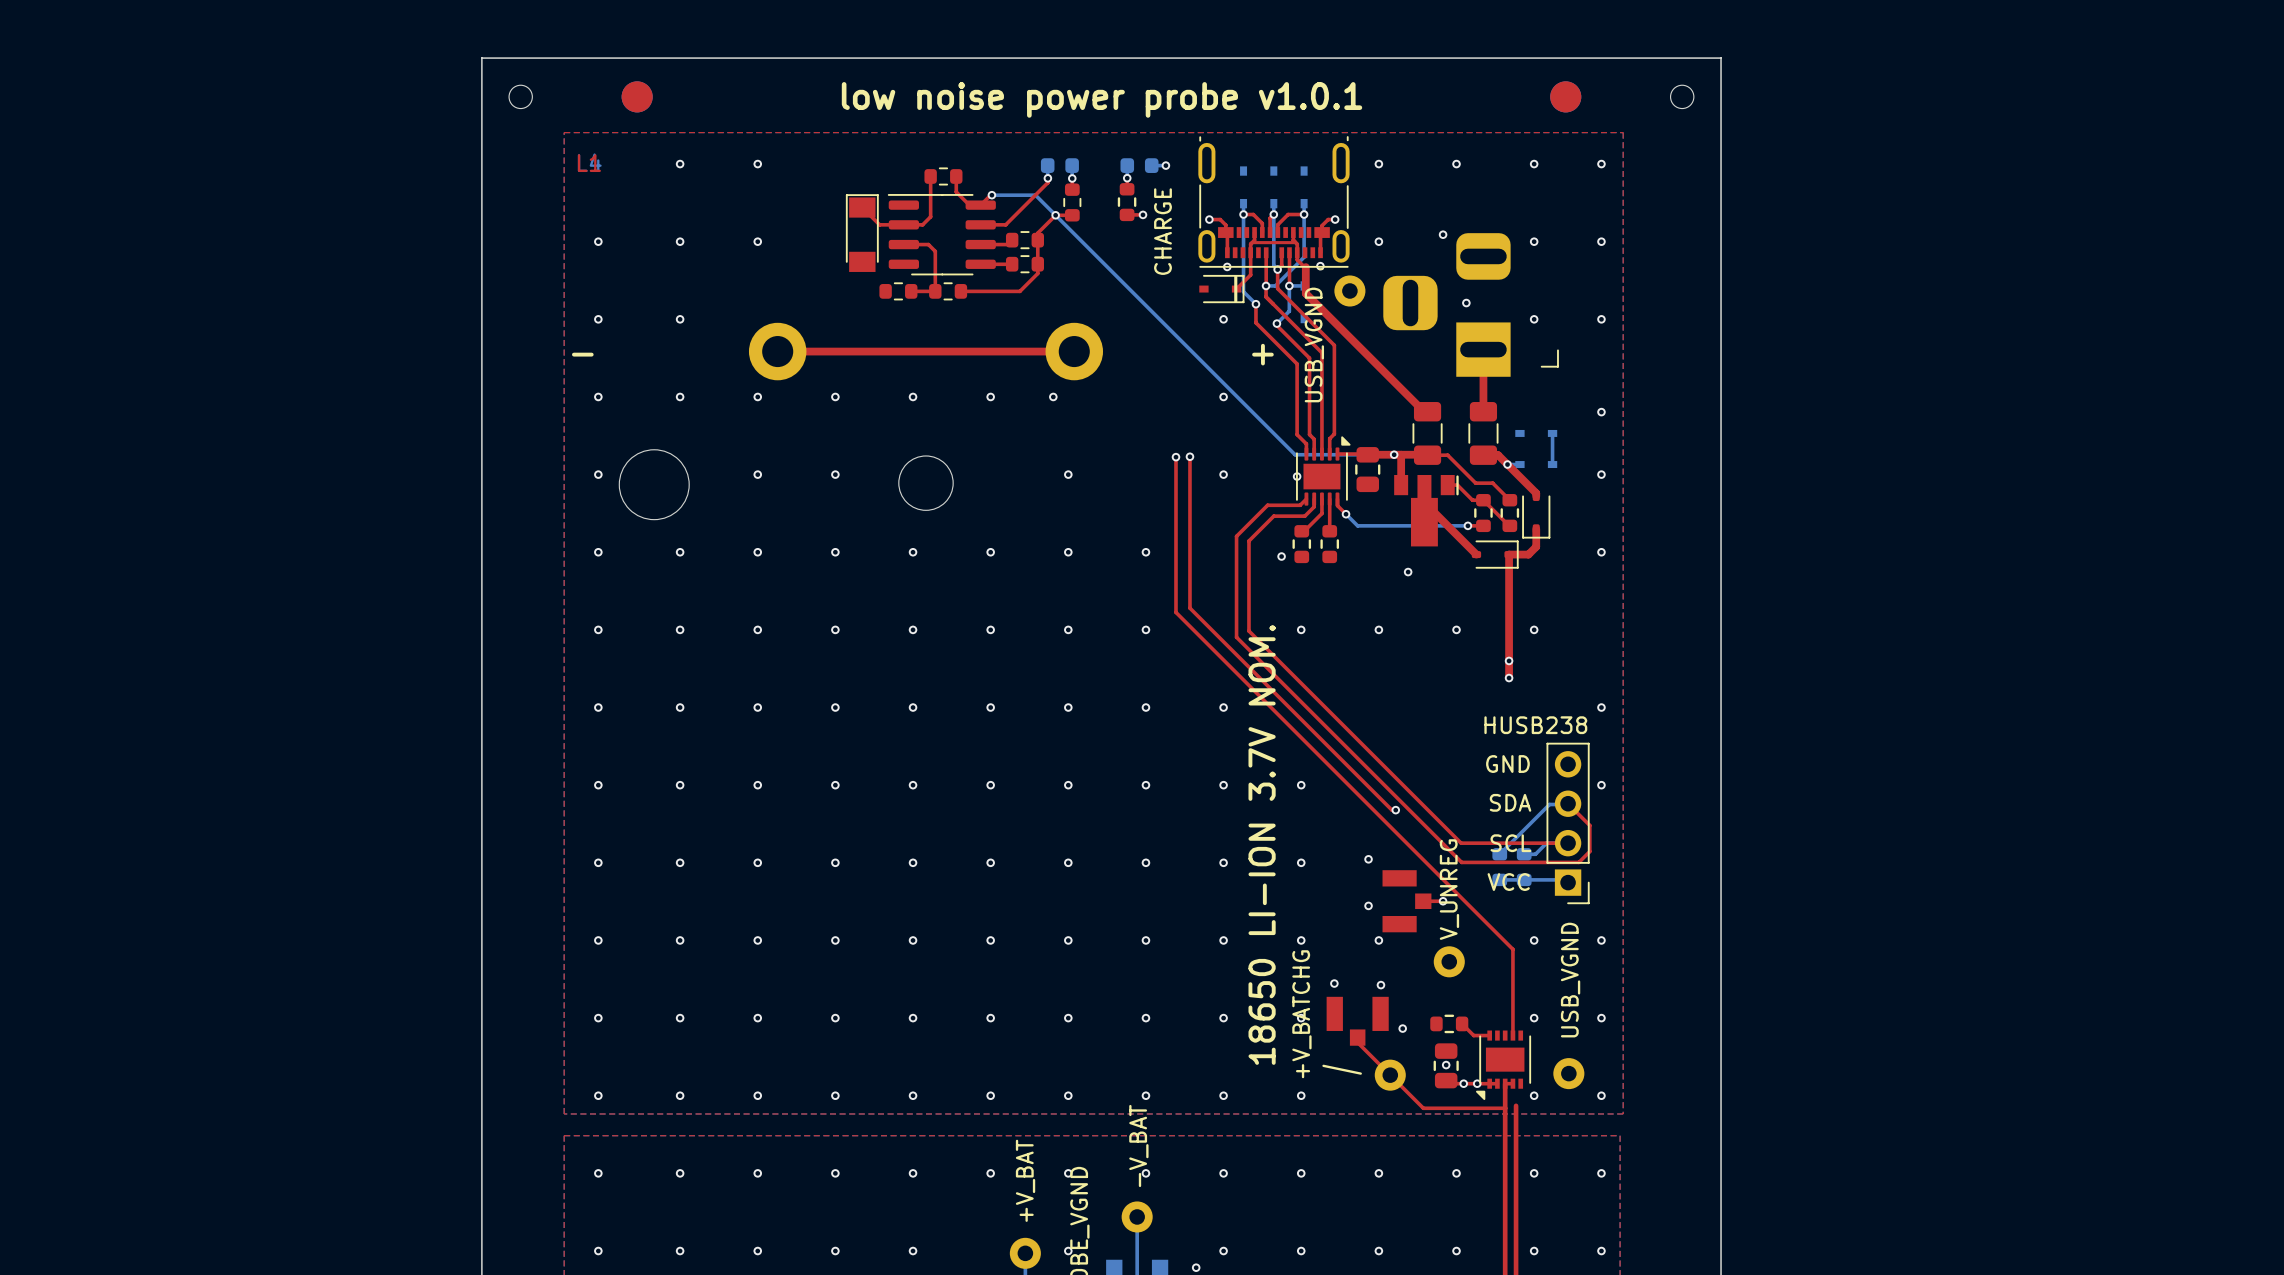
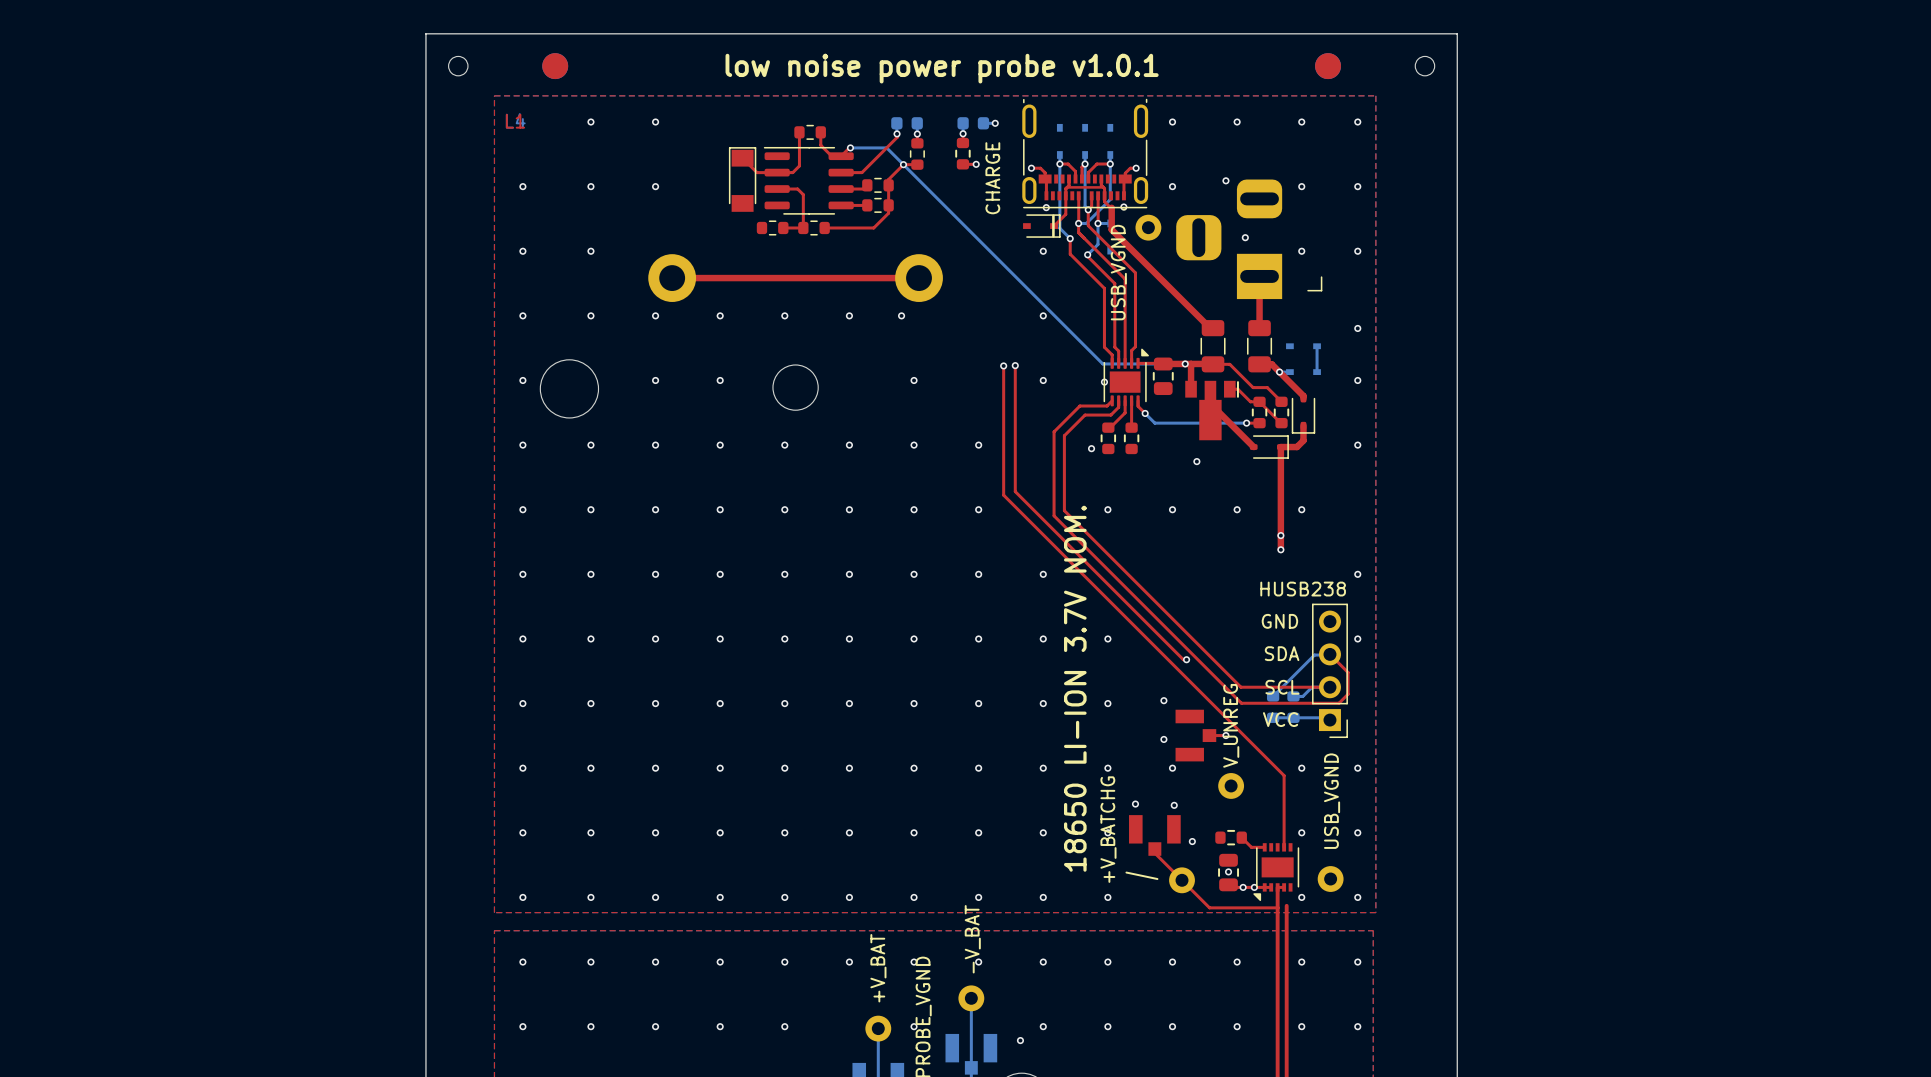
text: - (582, 354) -> none
text: + (1262, 354) -> none

